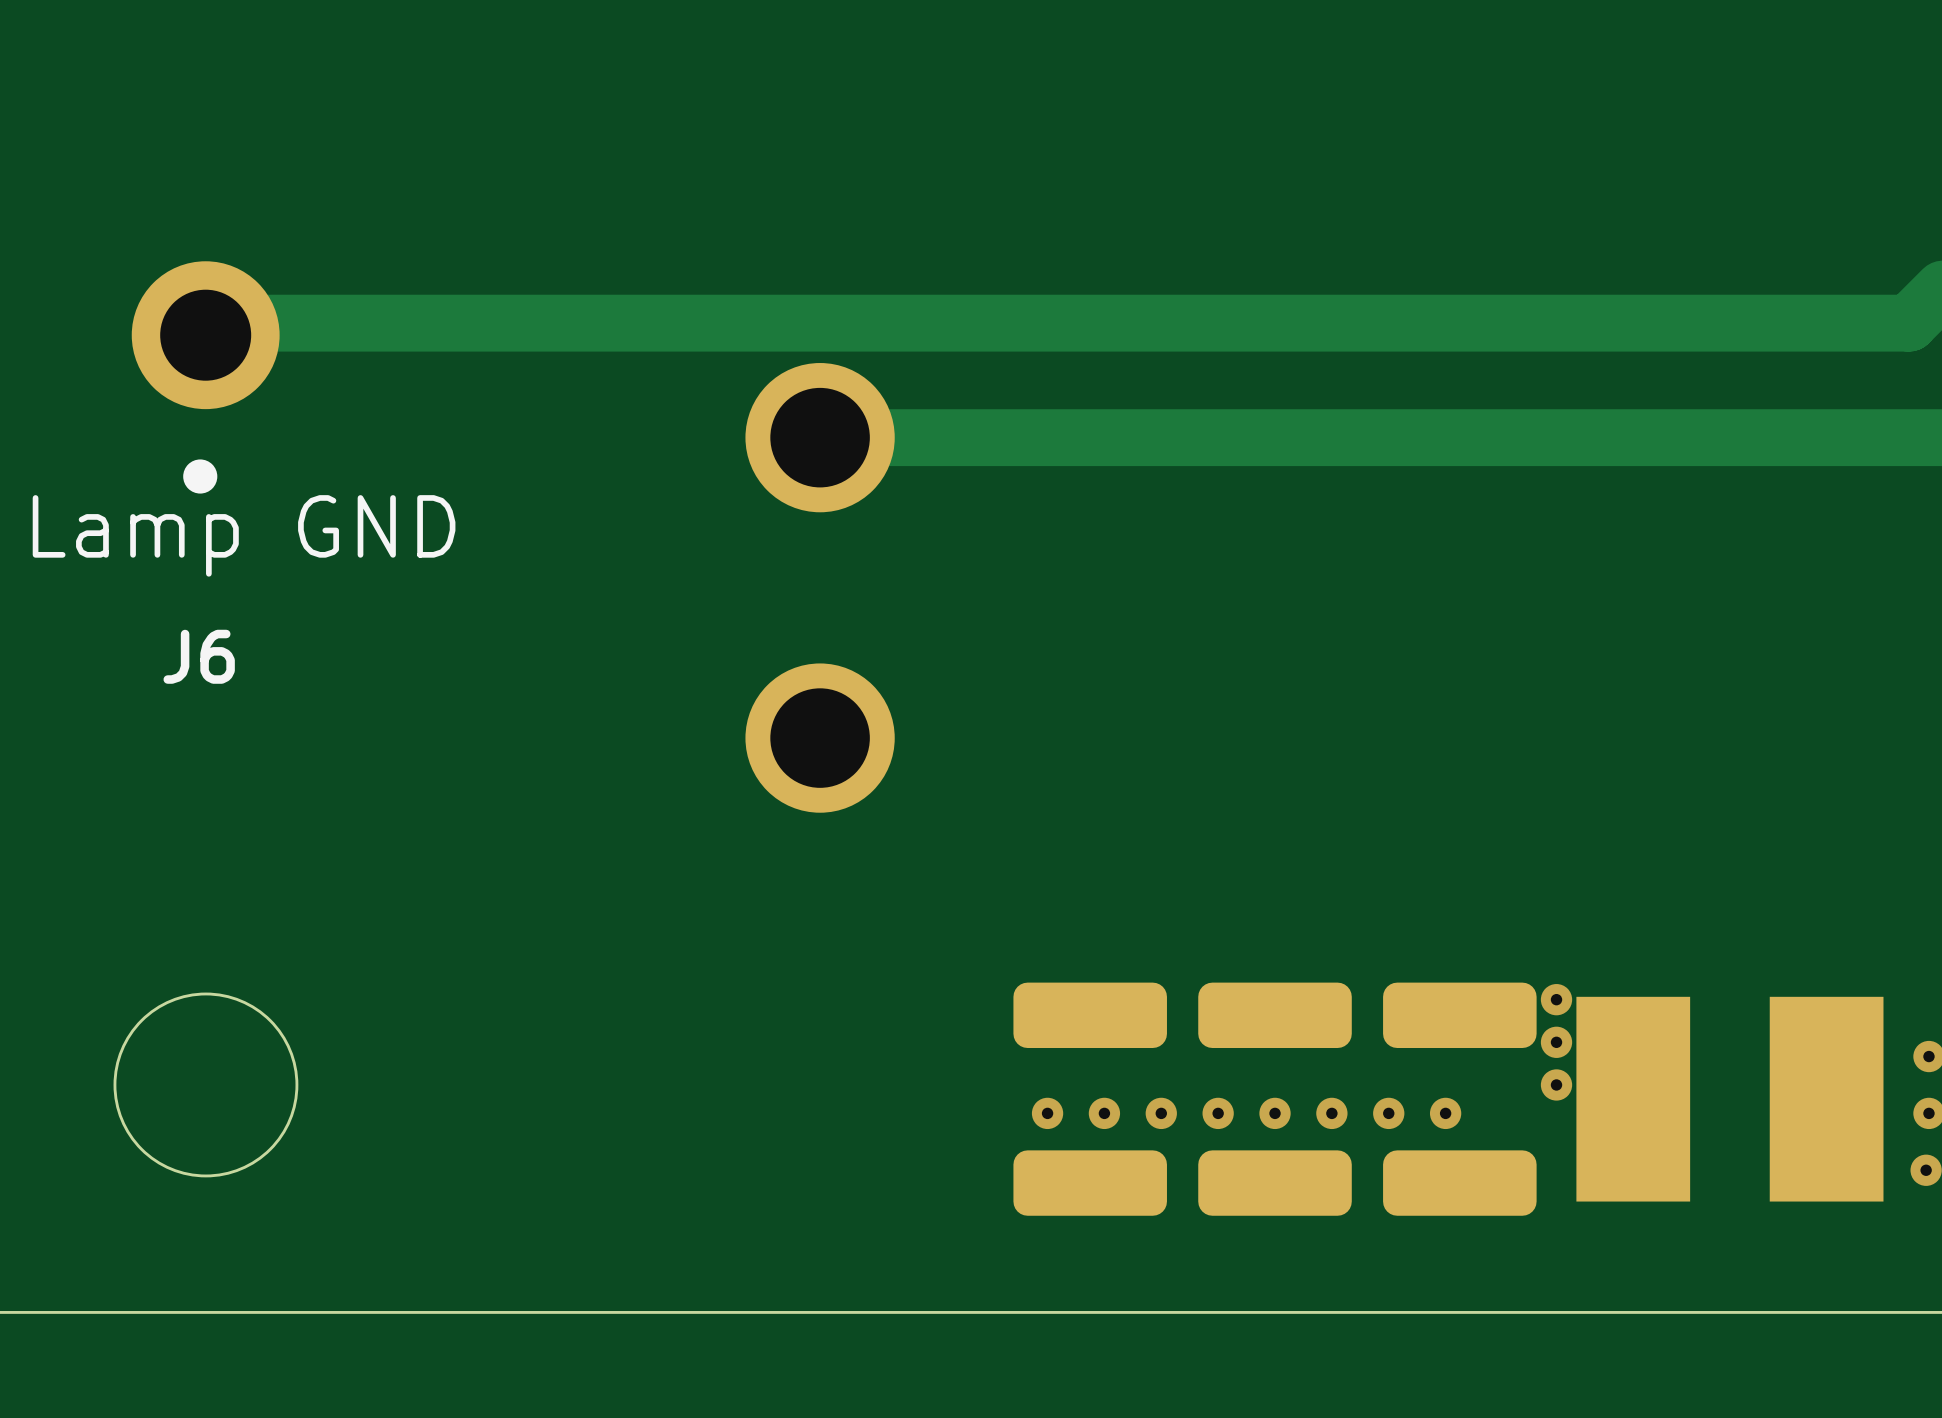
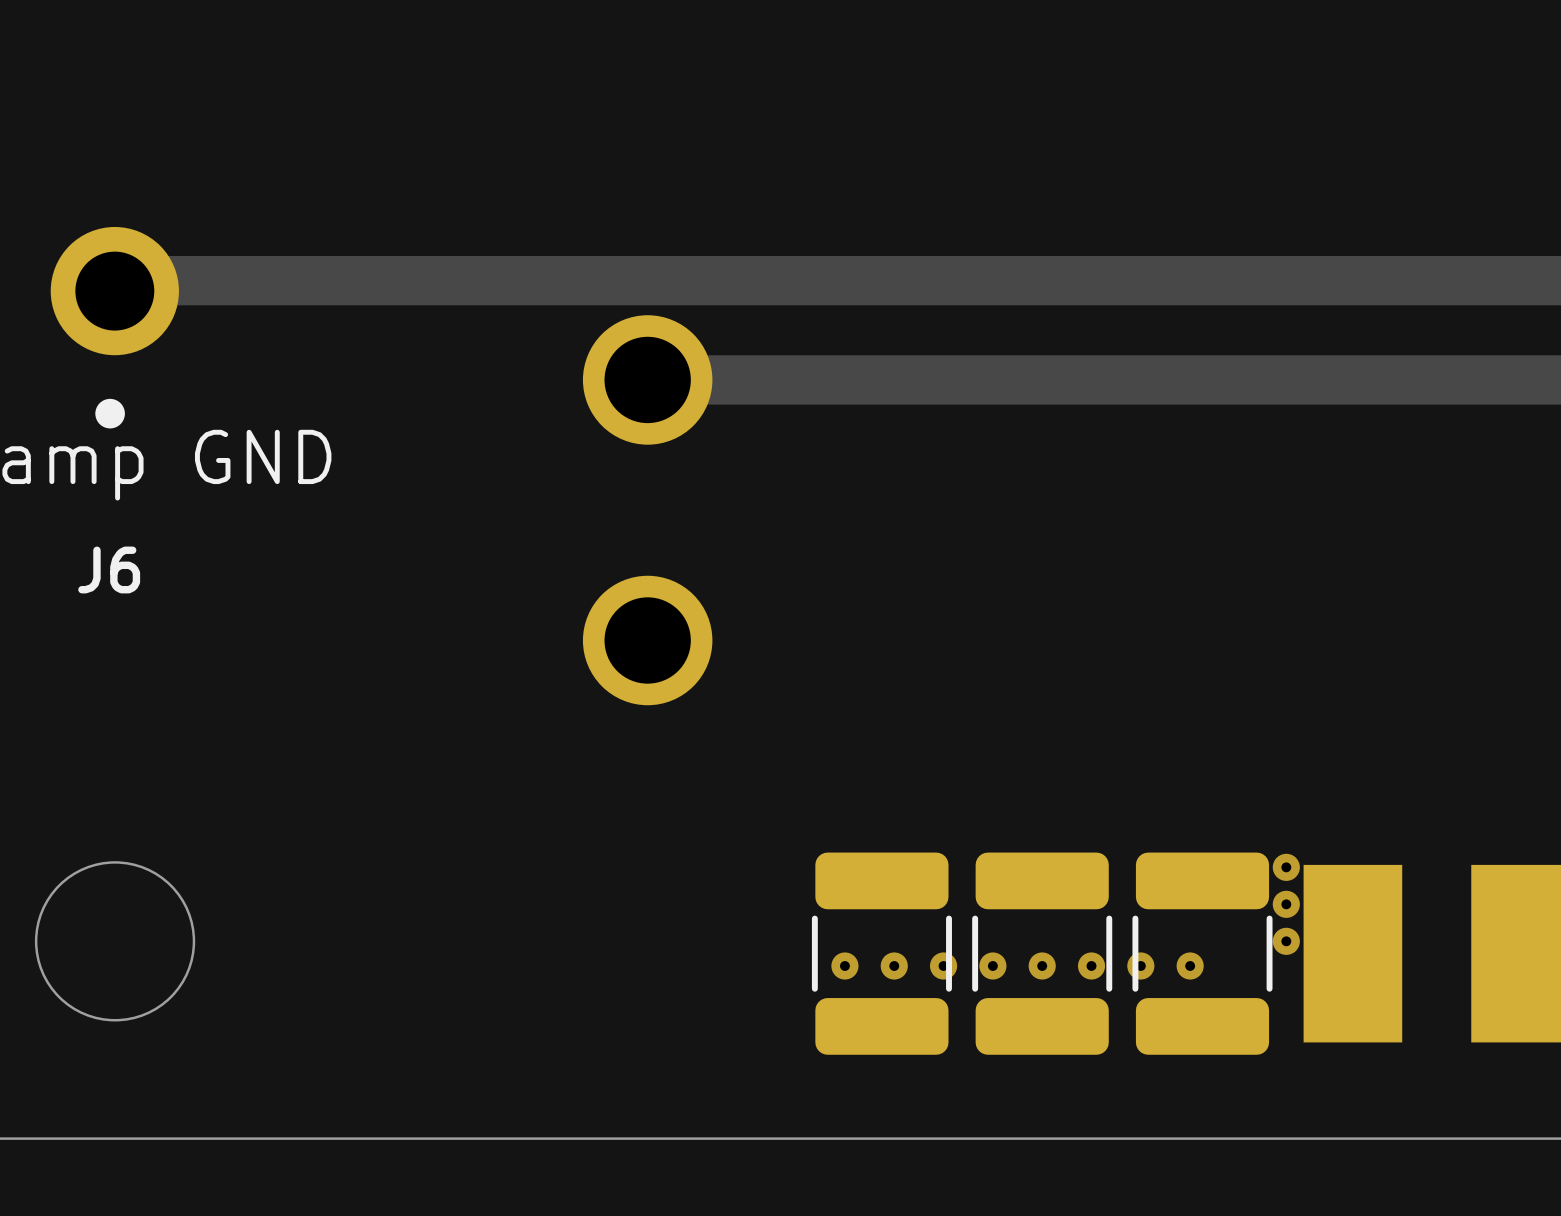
part footprint: [1013, 982, 1167, 1216] -> [811, 852, 952, 1055]
part footprint: [1198, 982, 1352, 1216] -> [972, 852, 1113, 1055]
part footprint: [1383, 982, 1537, 1216] -> [1132, 852, 1273, 1055]

